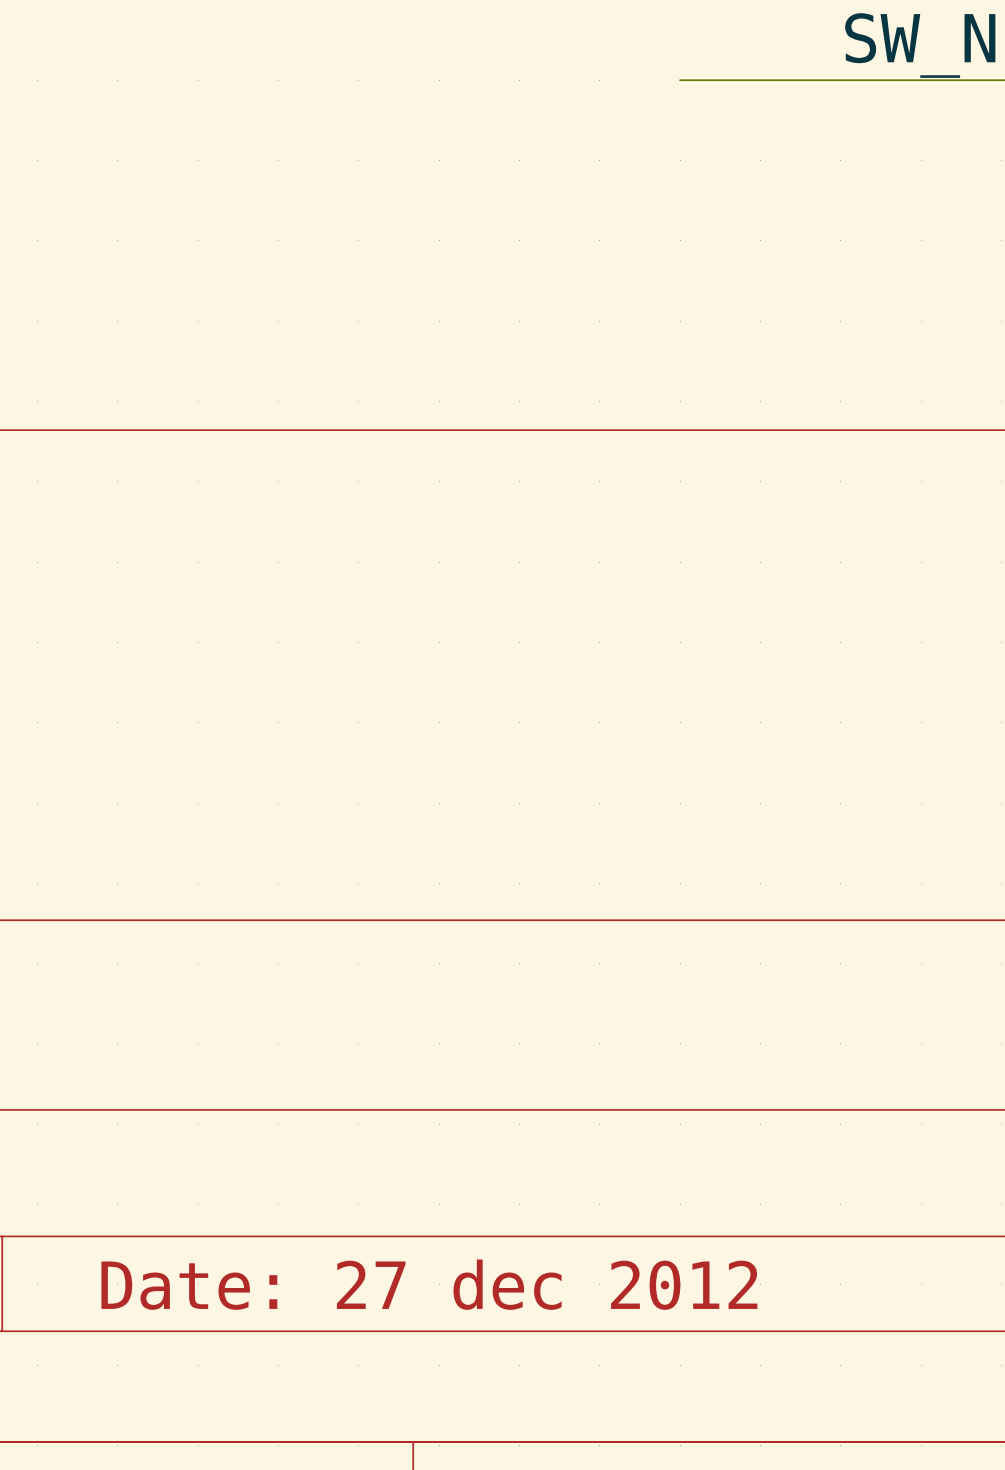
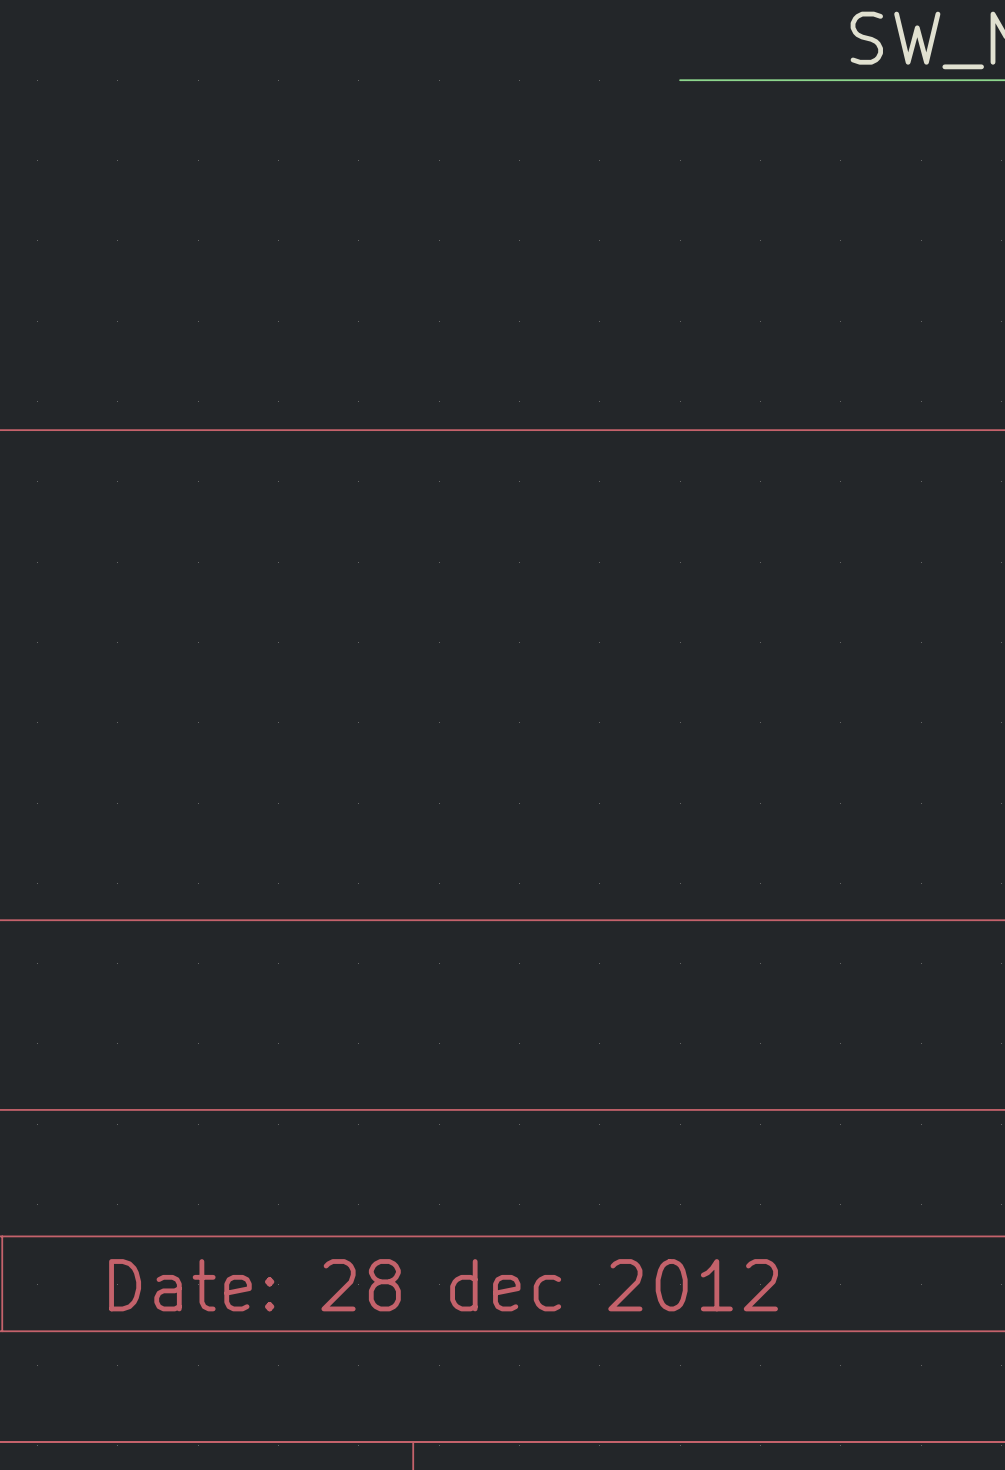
title block: Date: 27 dec 2012 (429, 1284) -> Date: 28 dec 2012 (443, 1285)

